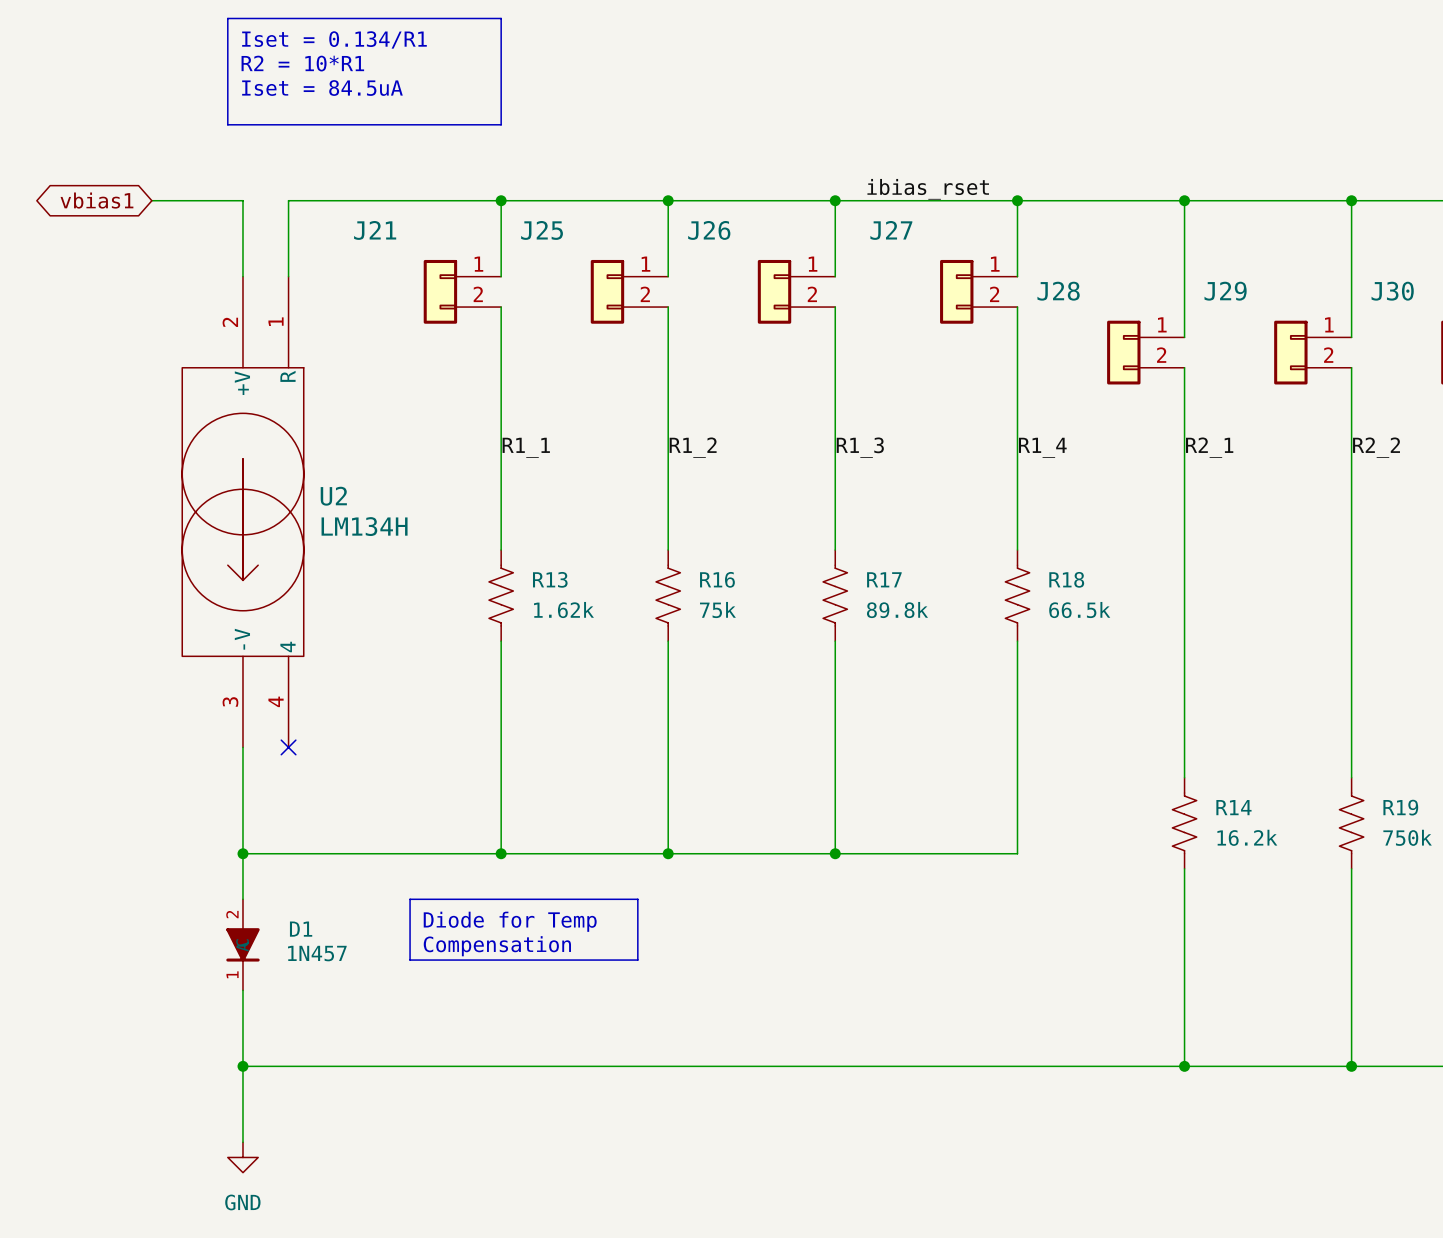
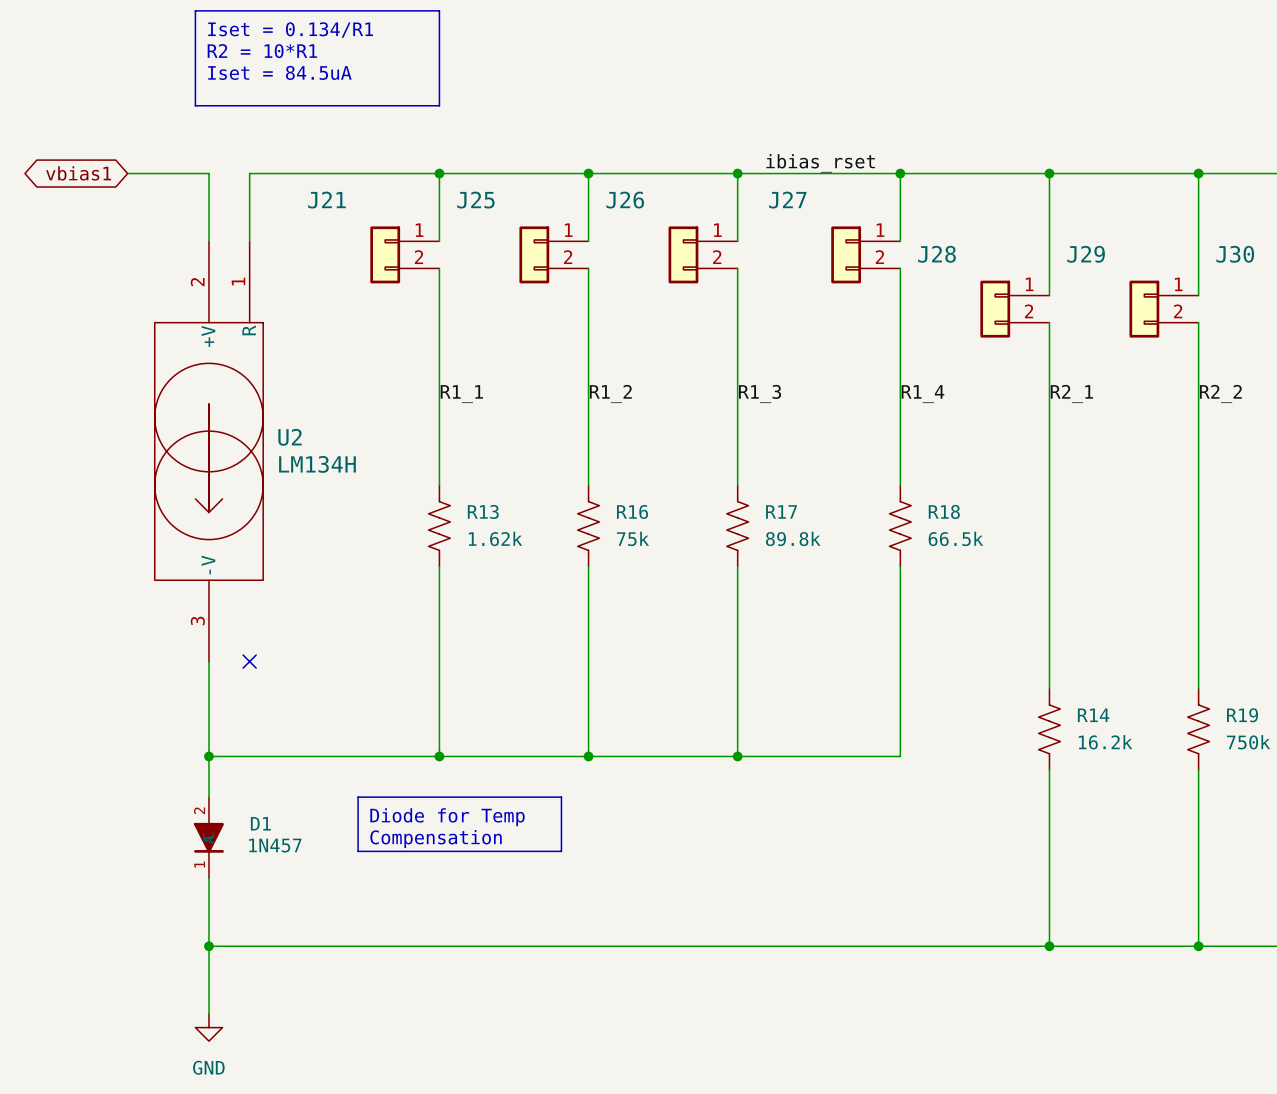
U2 symbol: [182, 276, 304, 748] -> [154, 241, 264, 662]

